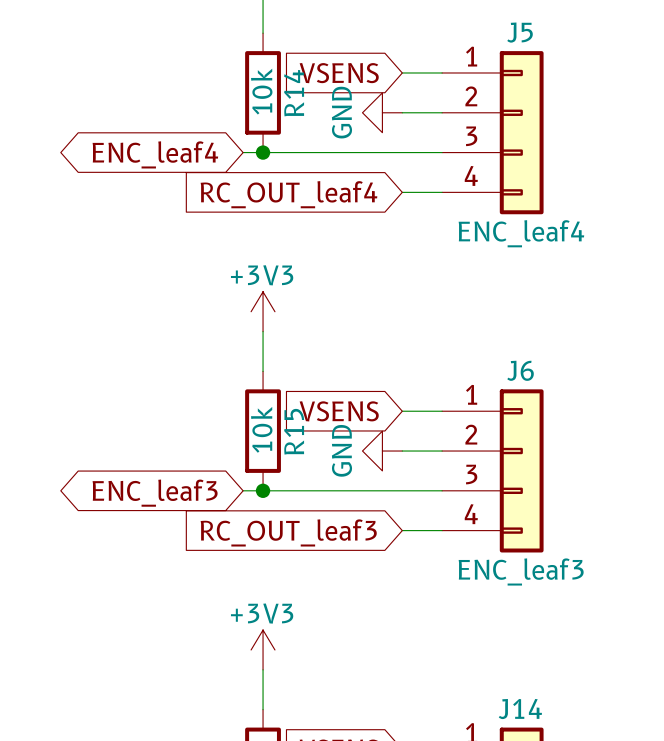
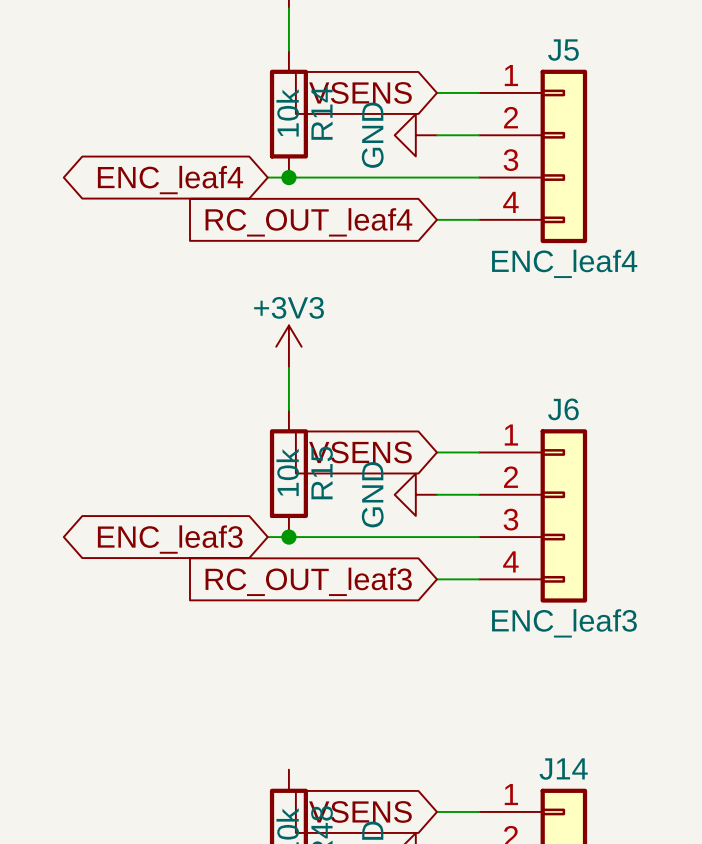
power symbol: +3V3 (263, 649) -> none
wire: (263, 669) (263, 709) -> none

